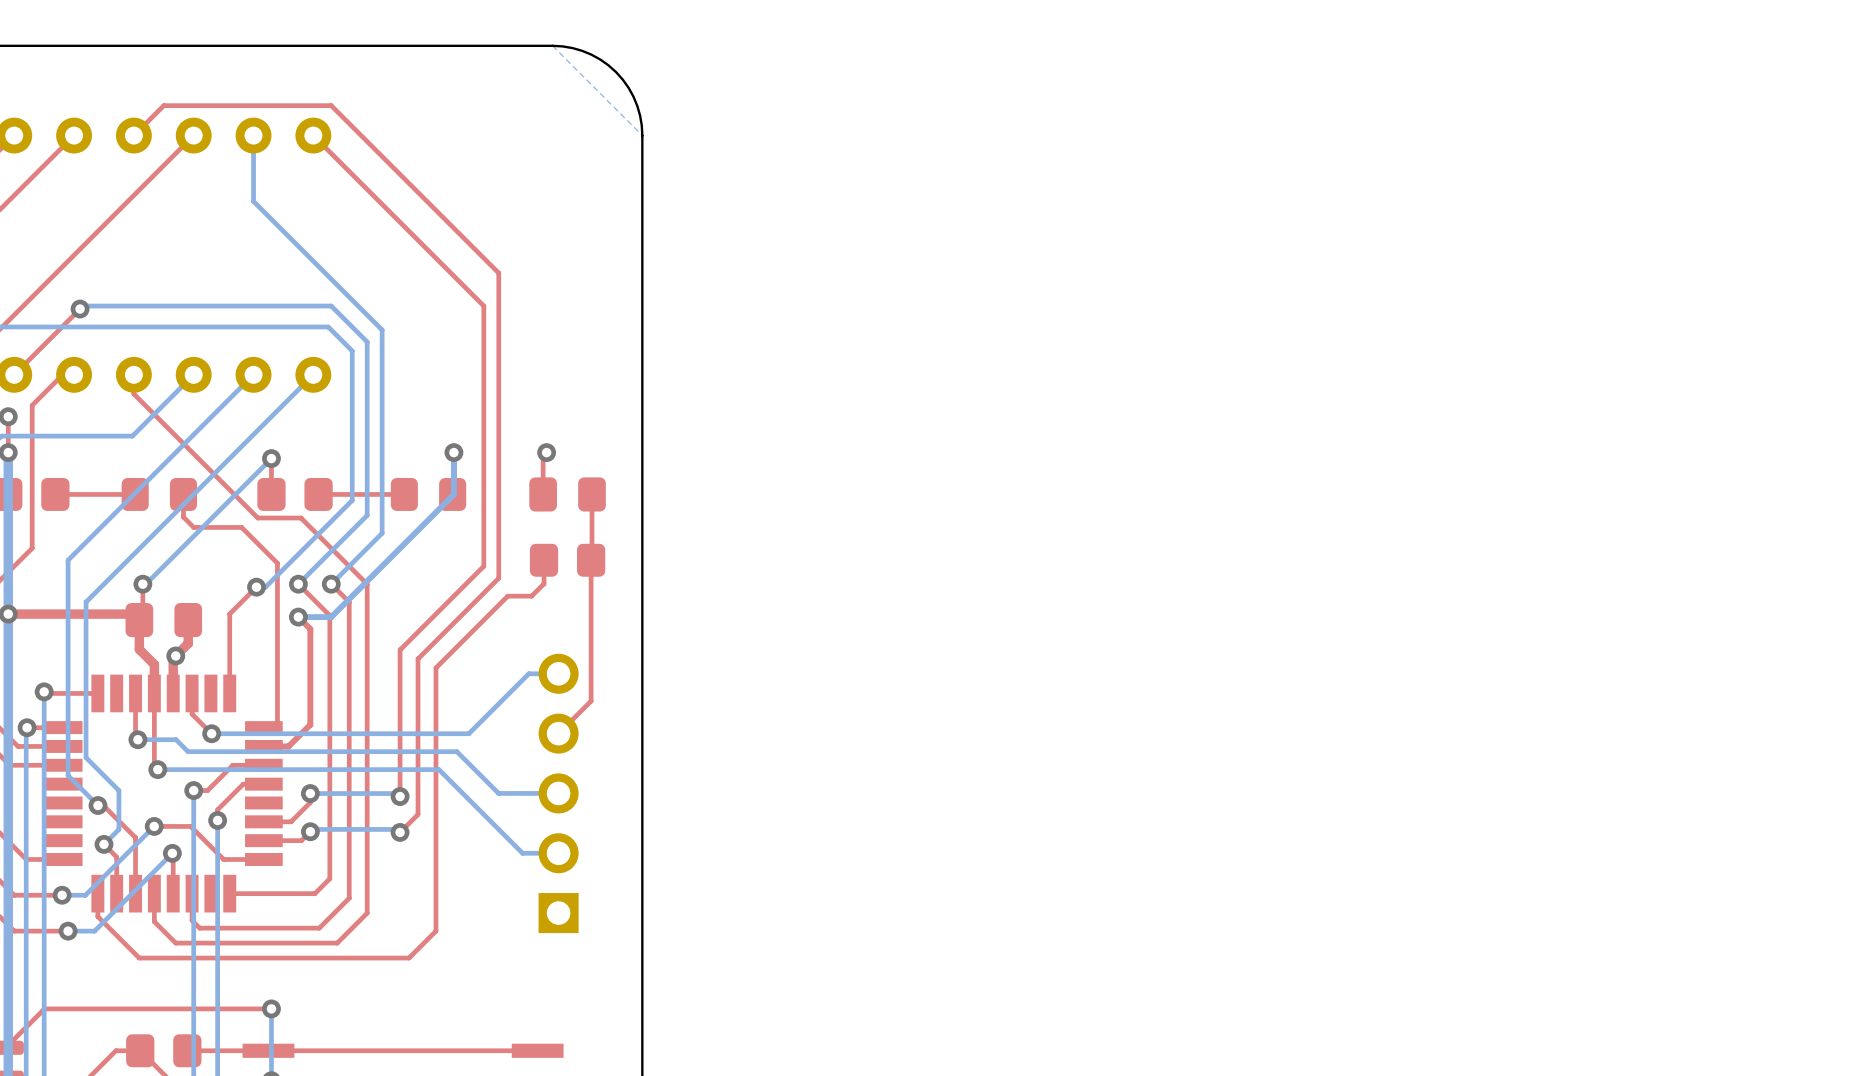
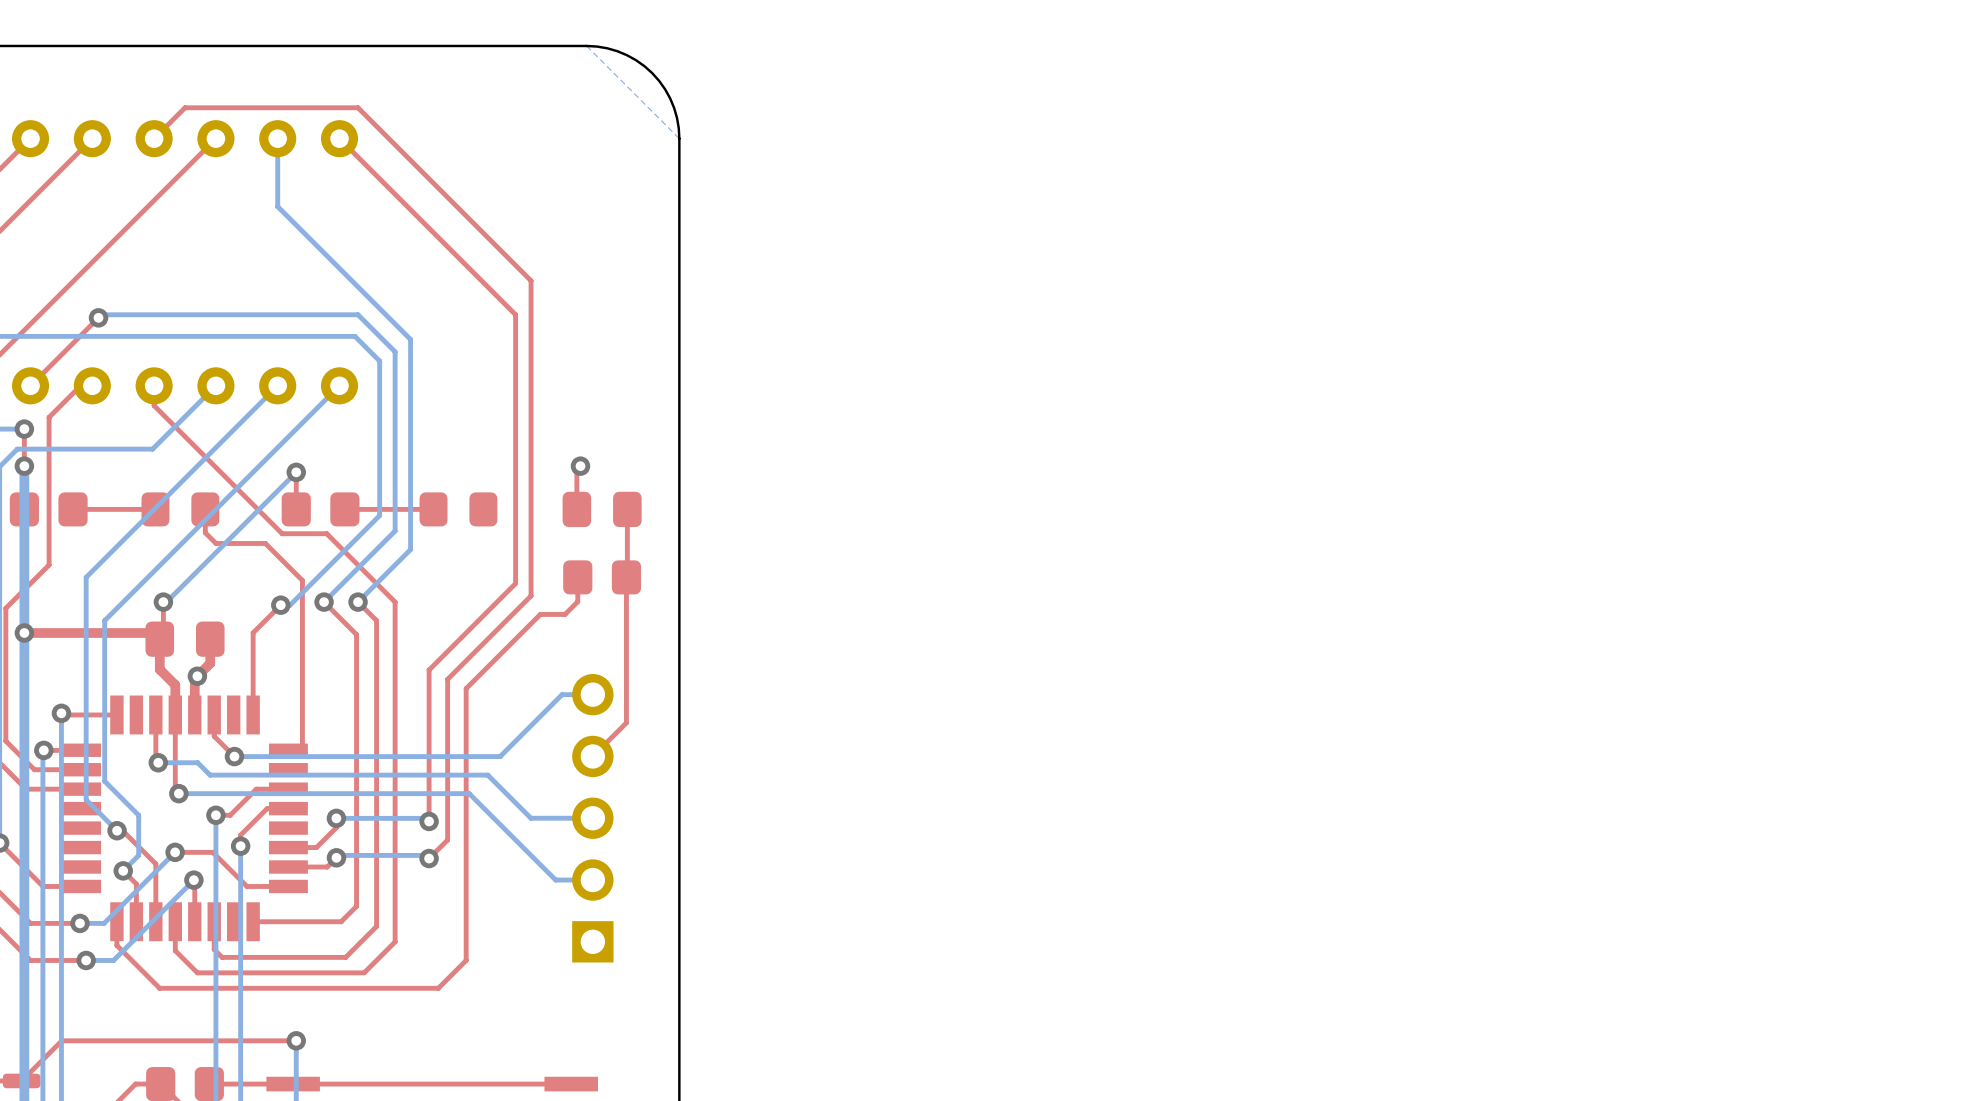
bottom track: (453, 452) (453, 494) (331, 617) (298, 617) -> none
via: (453, 452) -> none
top track: (298, 617) (310, 629) (310, 724) (288, 746) (263, 746) -> none
via: (298, 617) -> none

